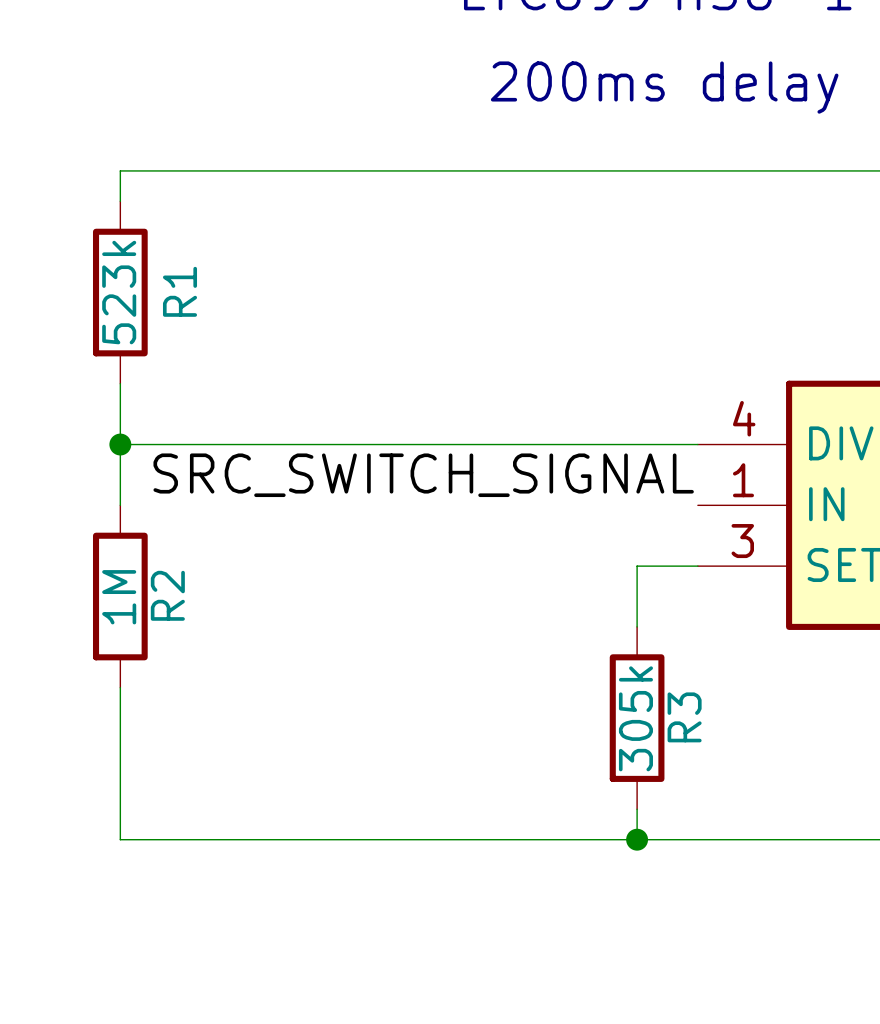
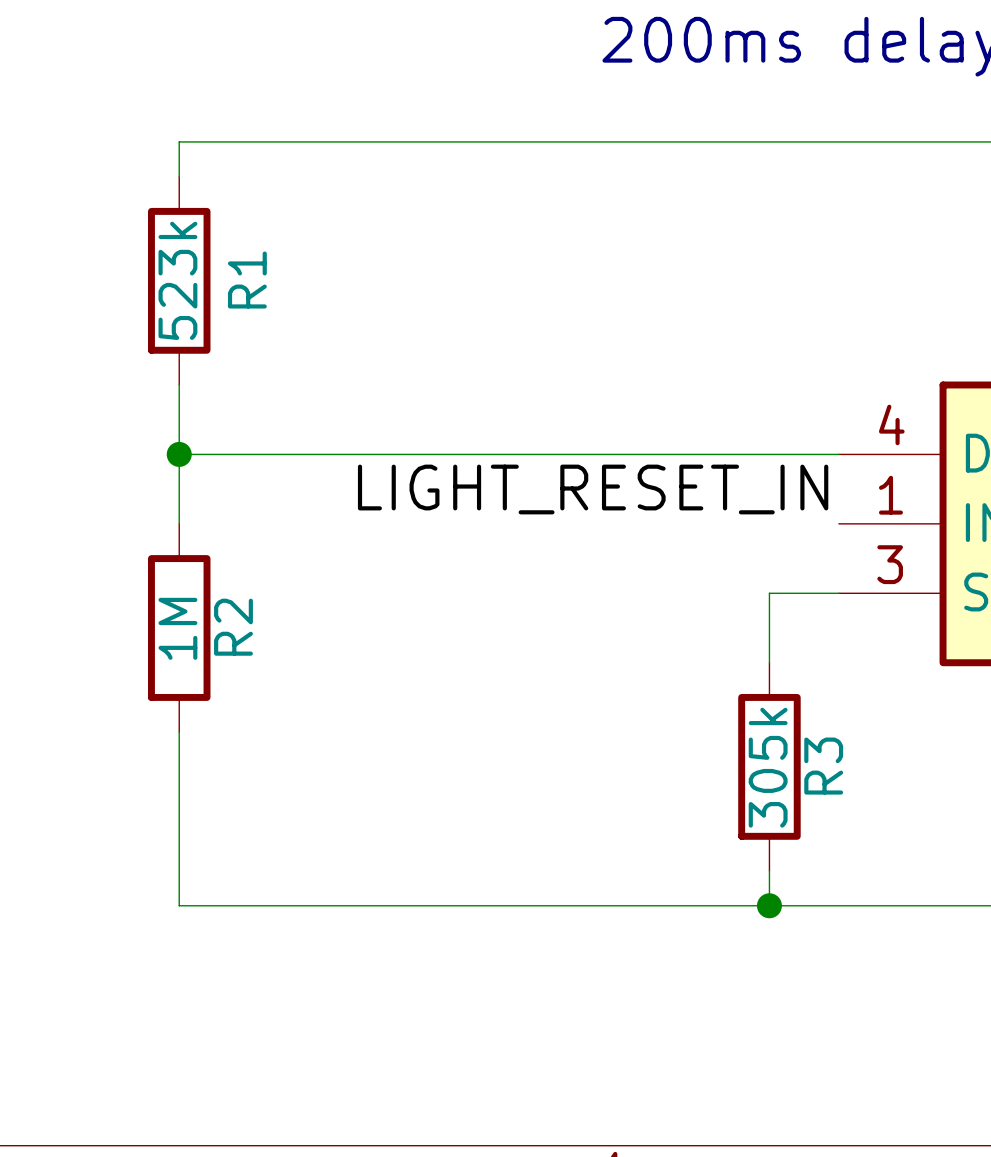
label: SRC_SWITCH_SIGNAL (423, 475) -> LIGHT_RESET_IN (593, 489)

